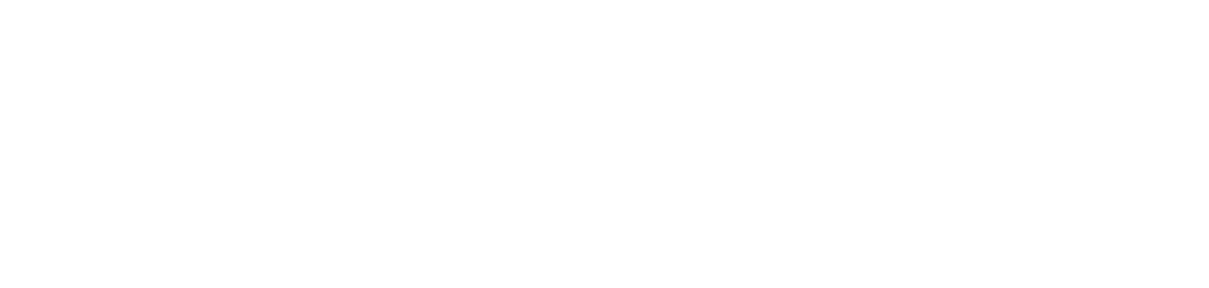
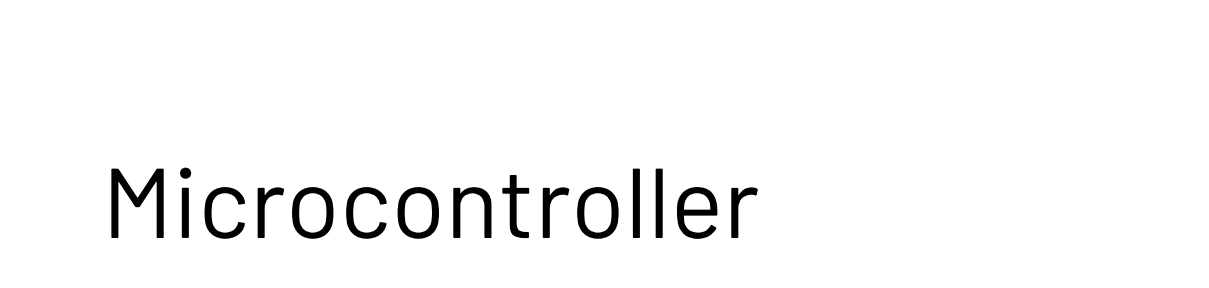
text: none -> Microcontroller (434, 203)

